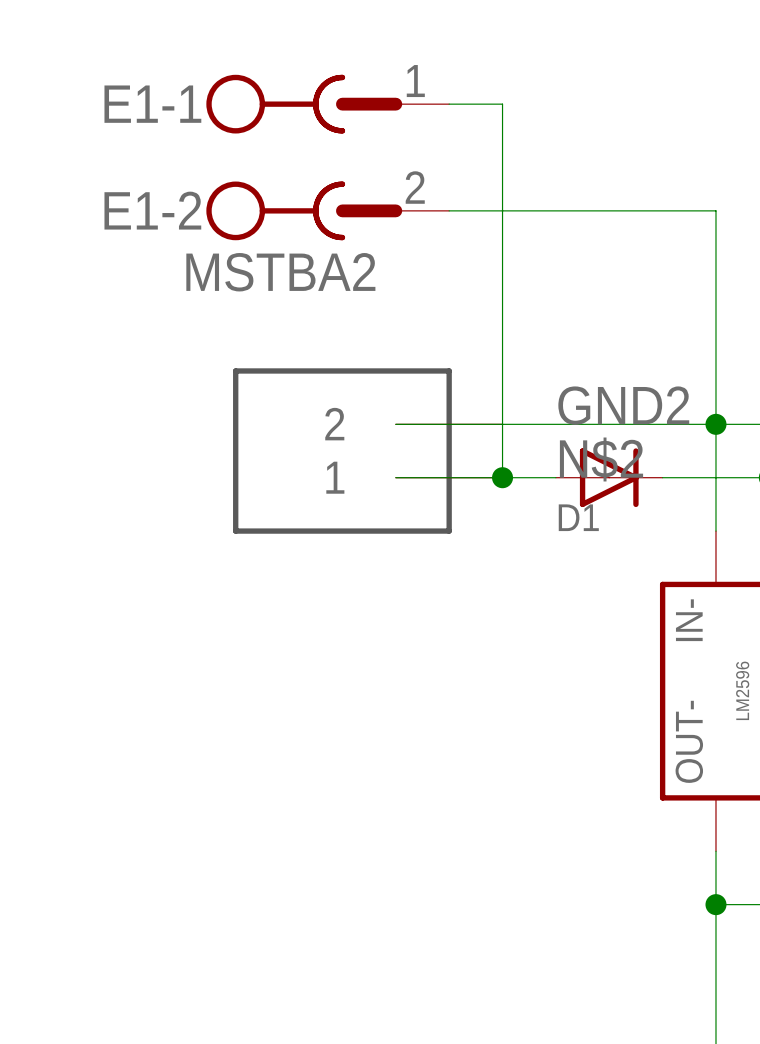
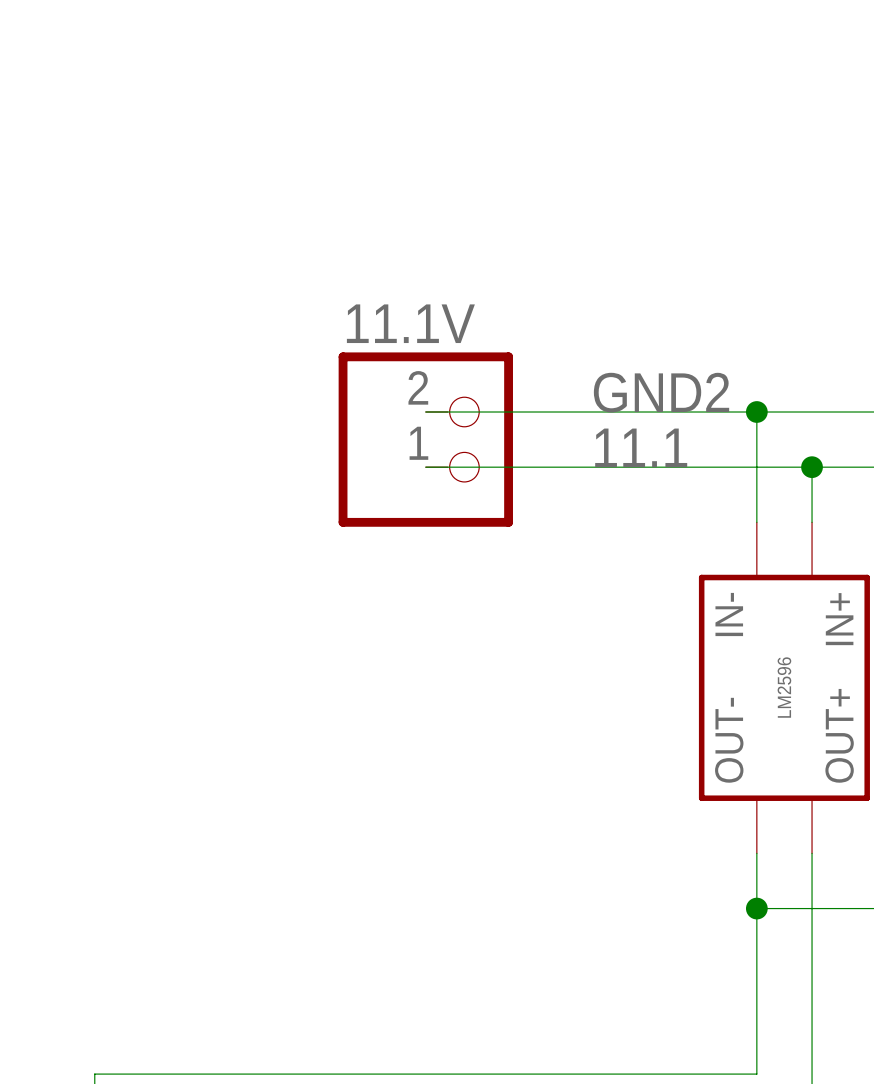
E1-1: (327, 104) -> none
wire: (449, 104) (502, 104) (502, 477) -> none
E1-2: MSTBA2 (327, 210) -> none
wire: (449, 210) (715, 210) (715, 424) -> none
part: (367, 451) -> none
11.1V: none -> (425, 439)
label: N$2 (601, 459) -> 11.1 (641, 447)
junction: (502, 477) -> none
D1: (609, 477) -> none

